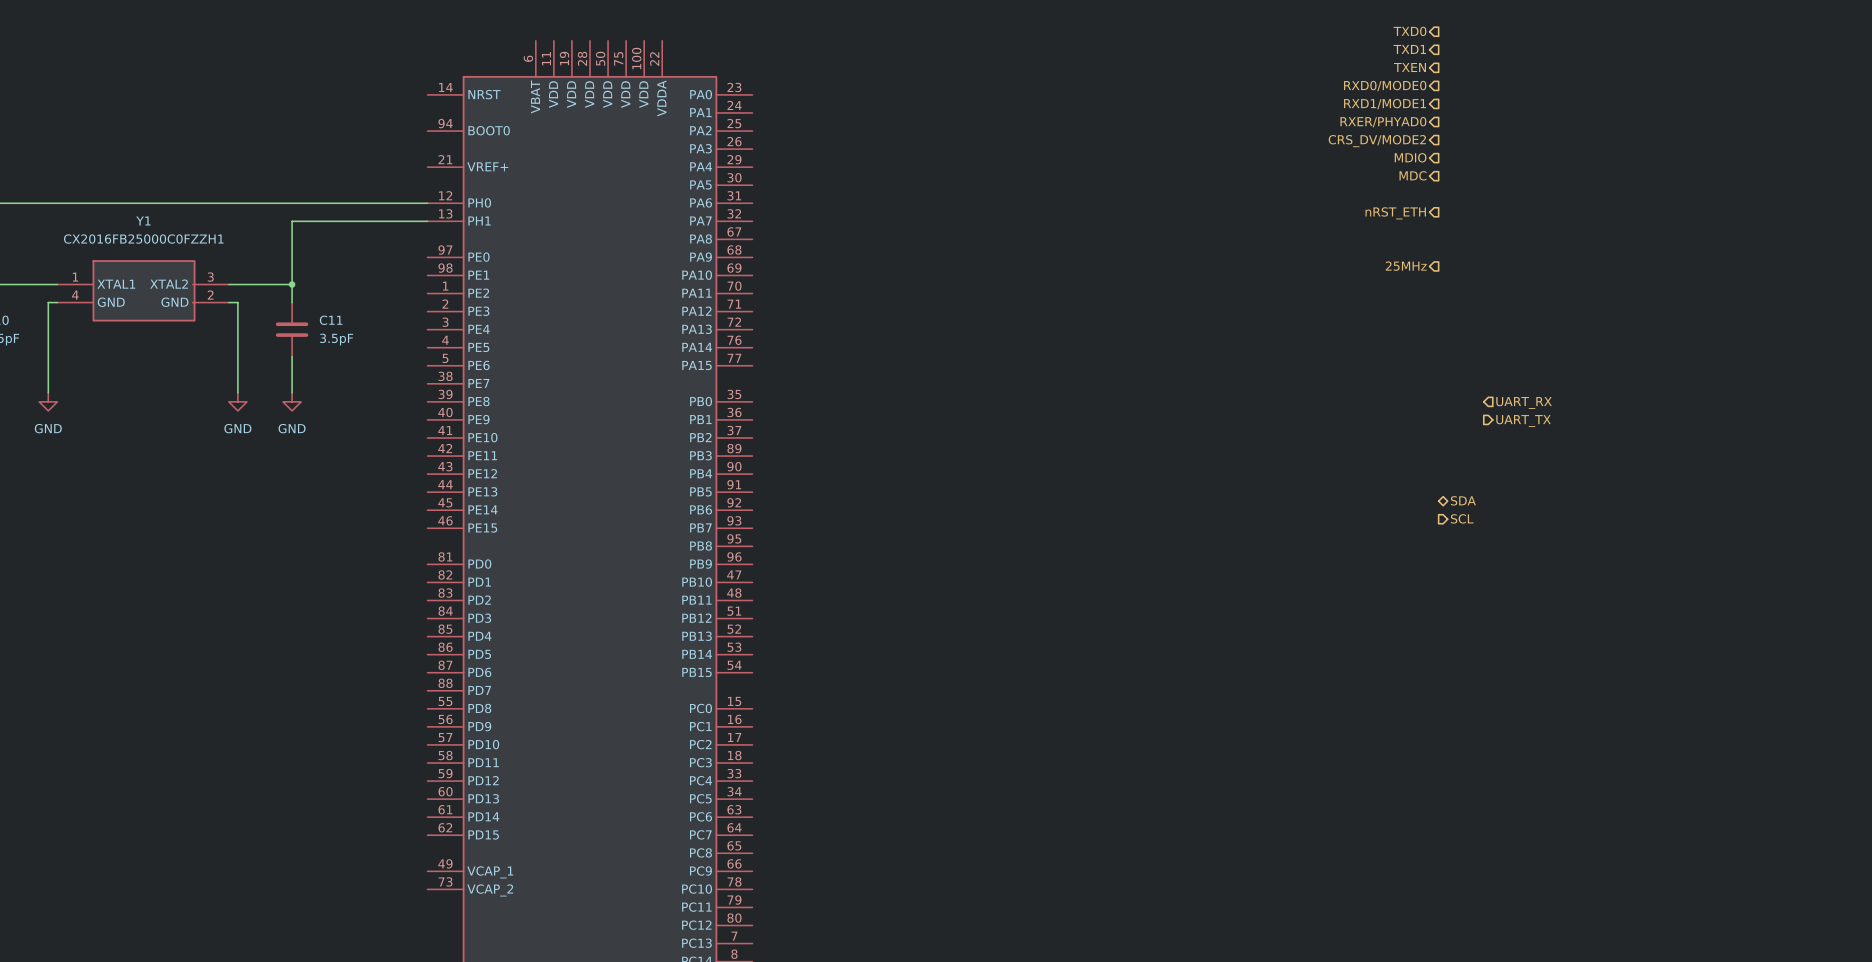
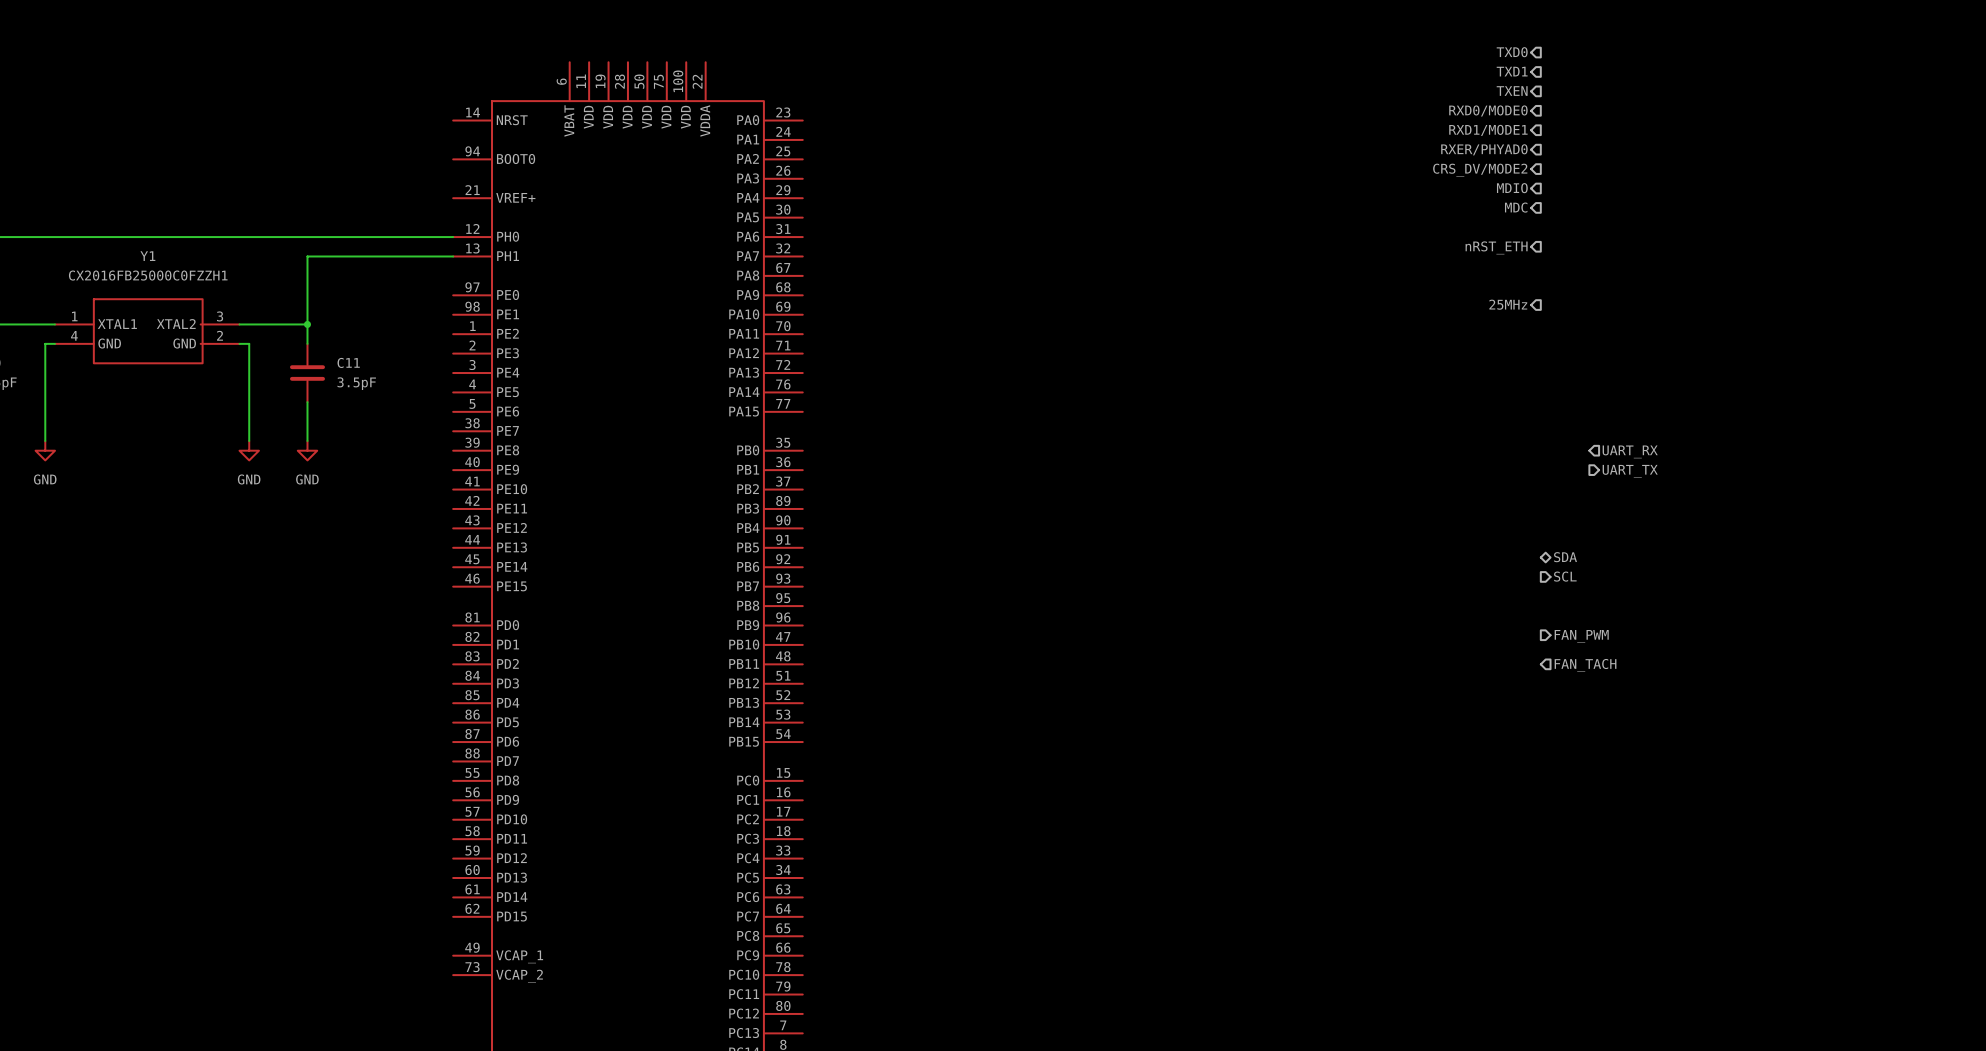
hierarchical label: none -> FAN_PWM (1581, 636)
hierarchical label: none -> FAN_TACH (1585, 665)

